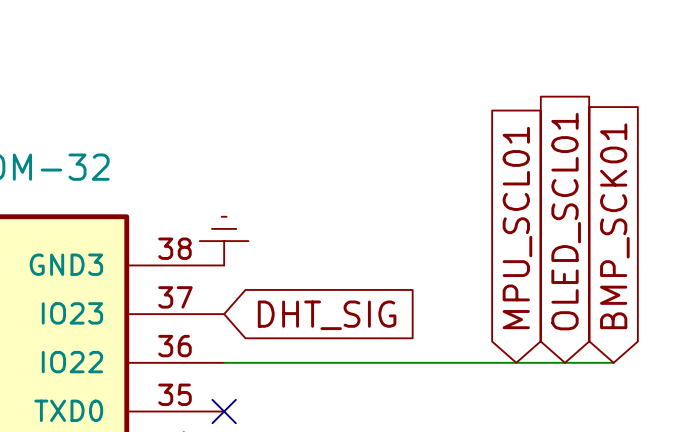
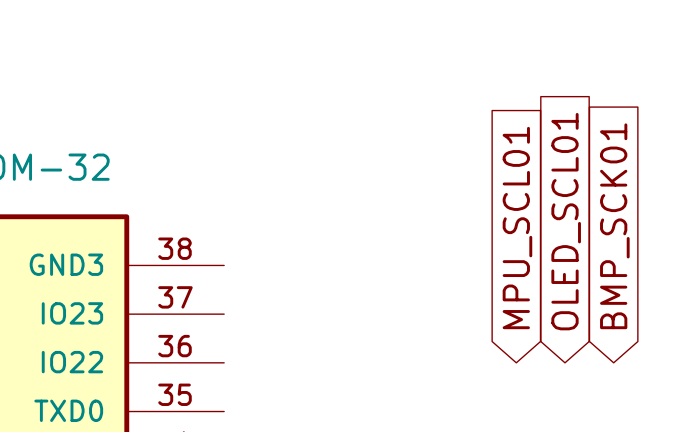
power symbol: (224, 241) -> none
global label: DHT_SIG (327, 315) -> none
wire: (224, 362) (613, 362) -> none
no-connect mark: (224, 411) -> none

